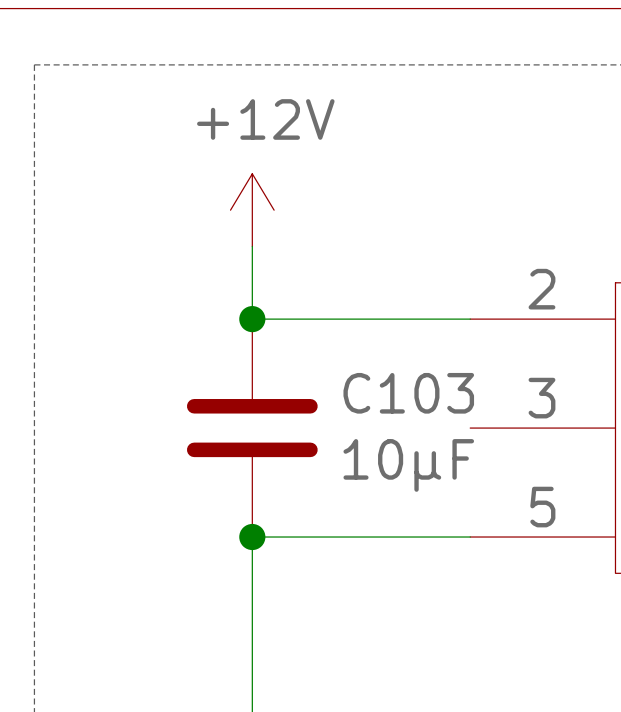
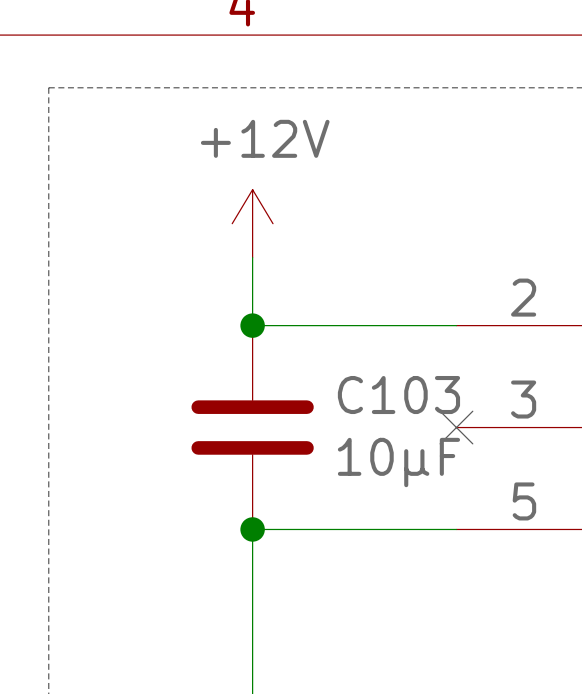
no-connect mark: none -> (456, 427)

